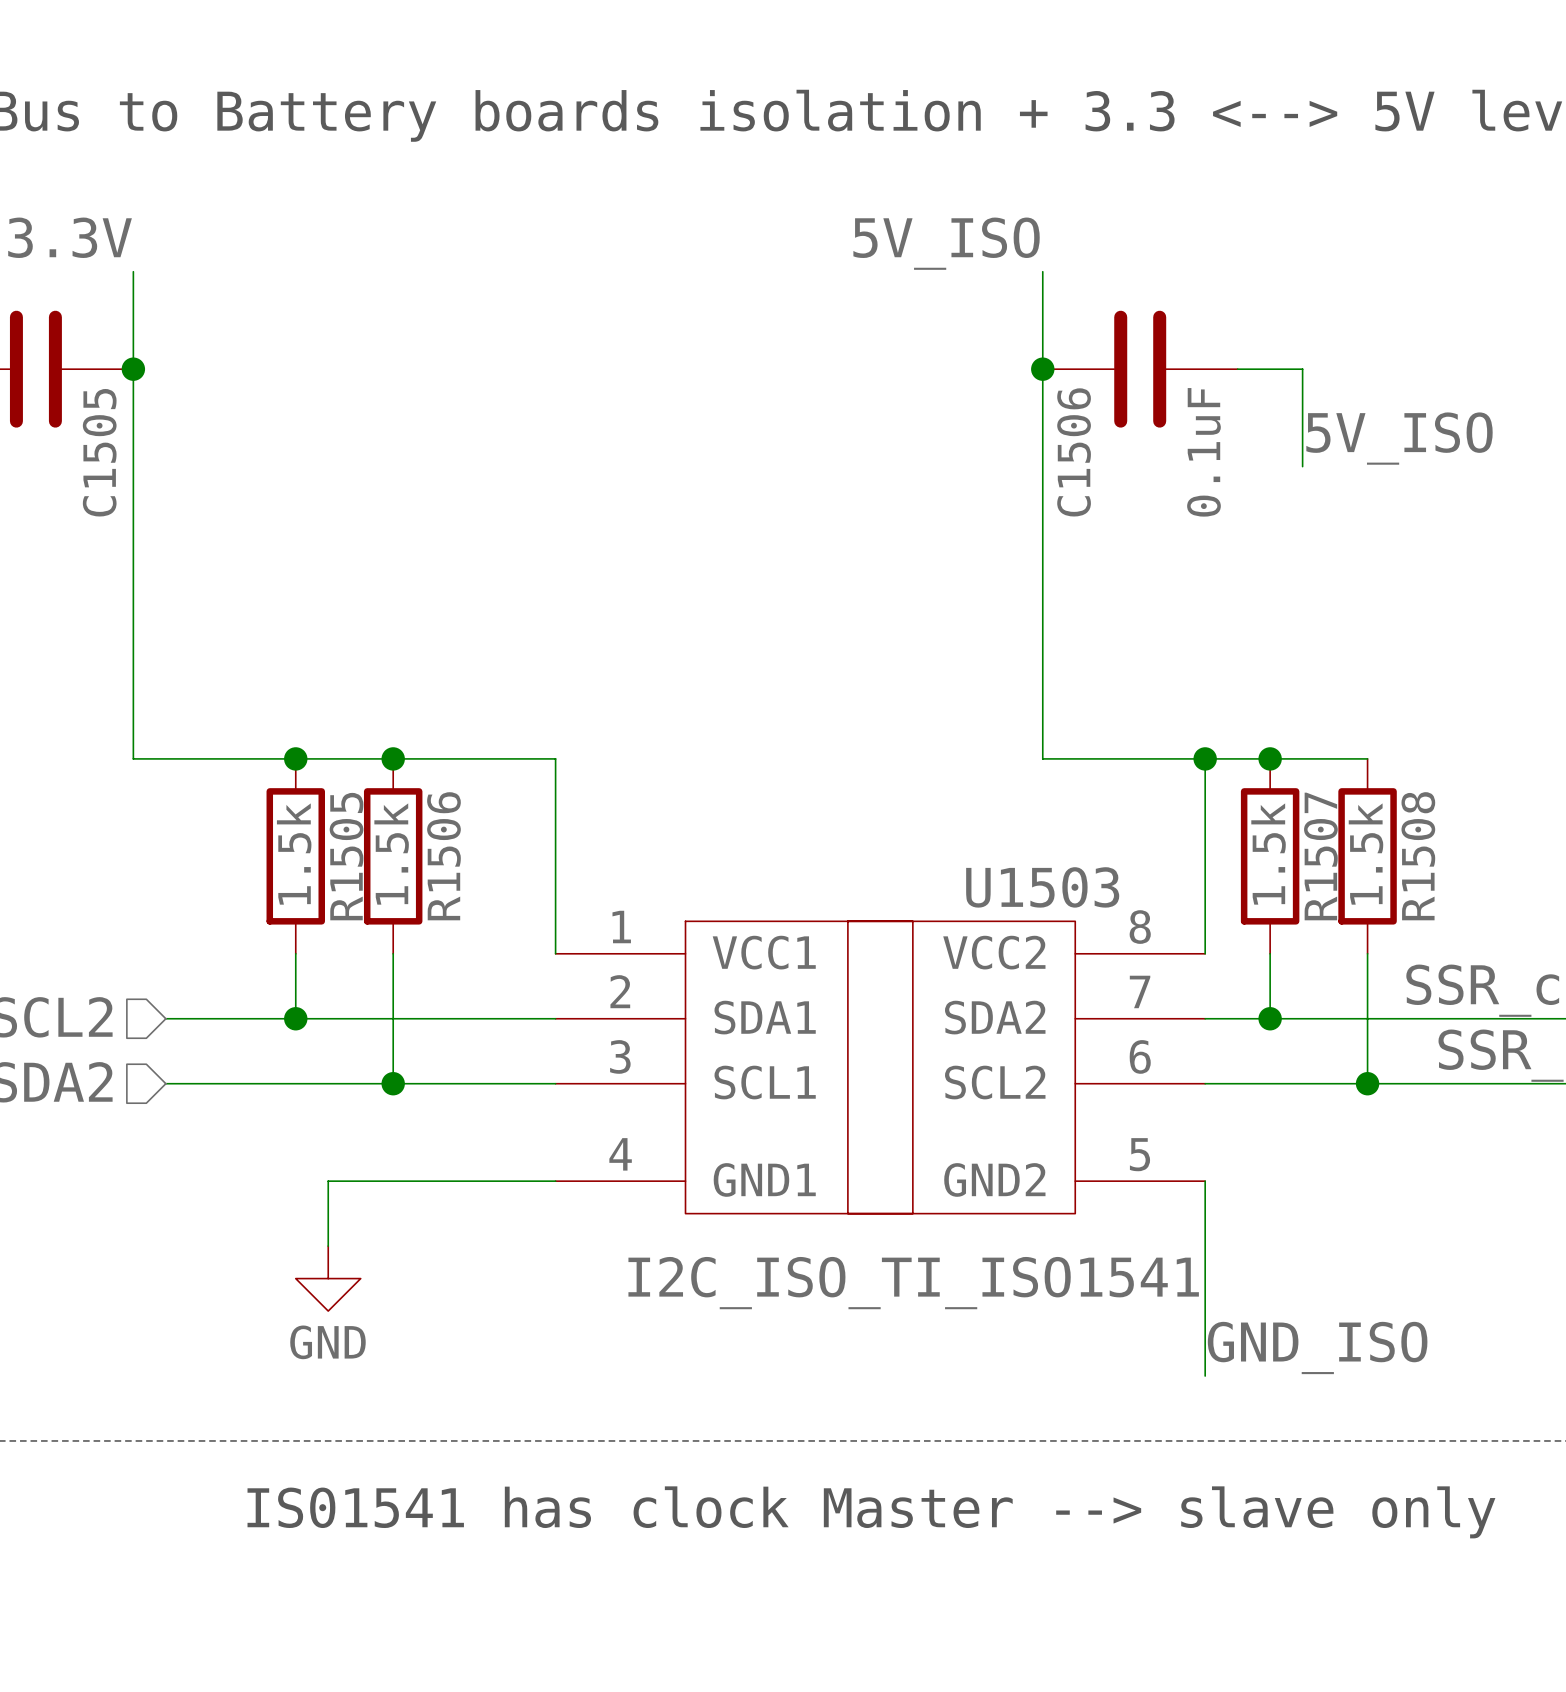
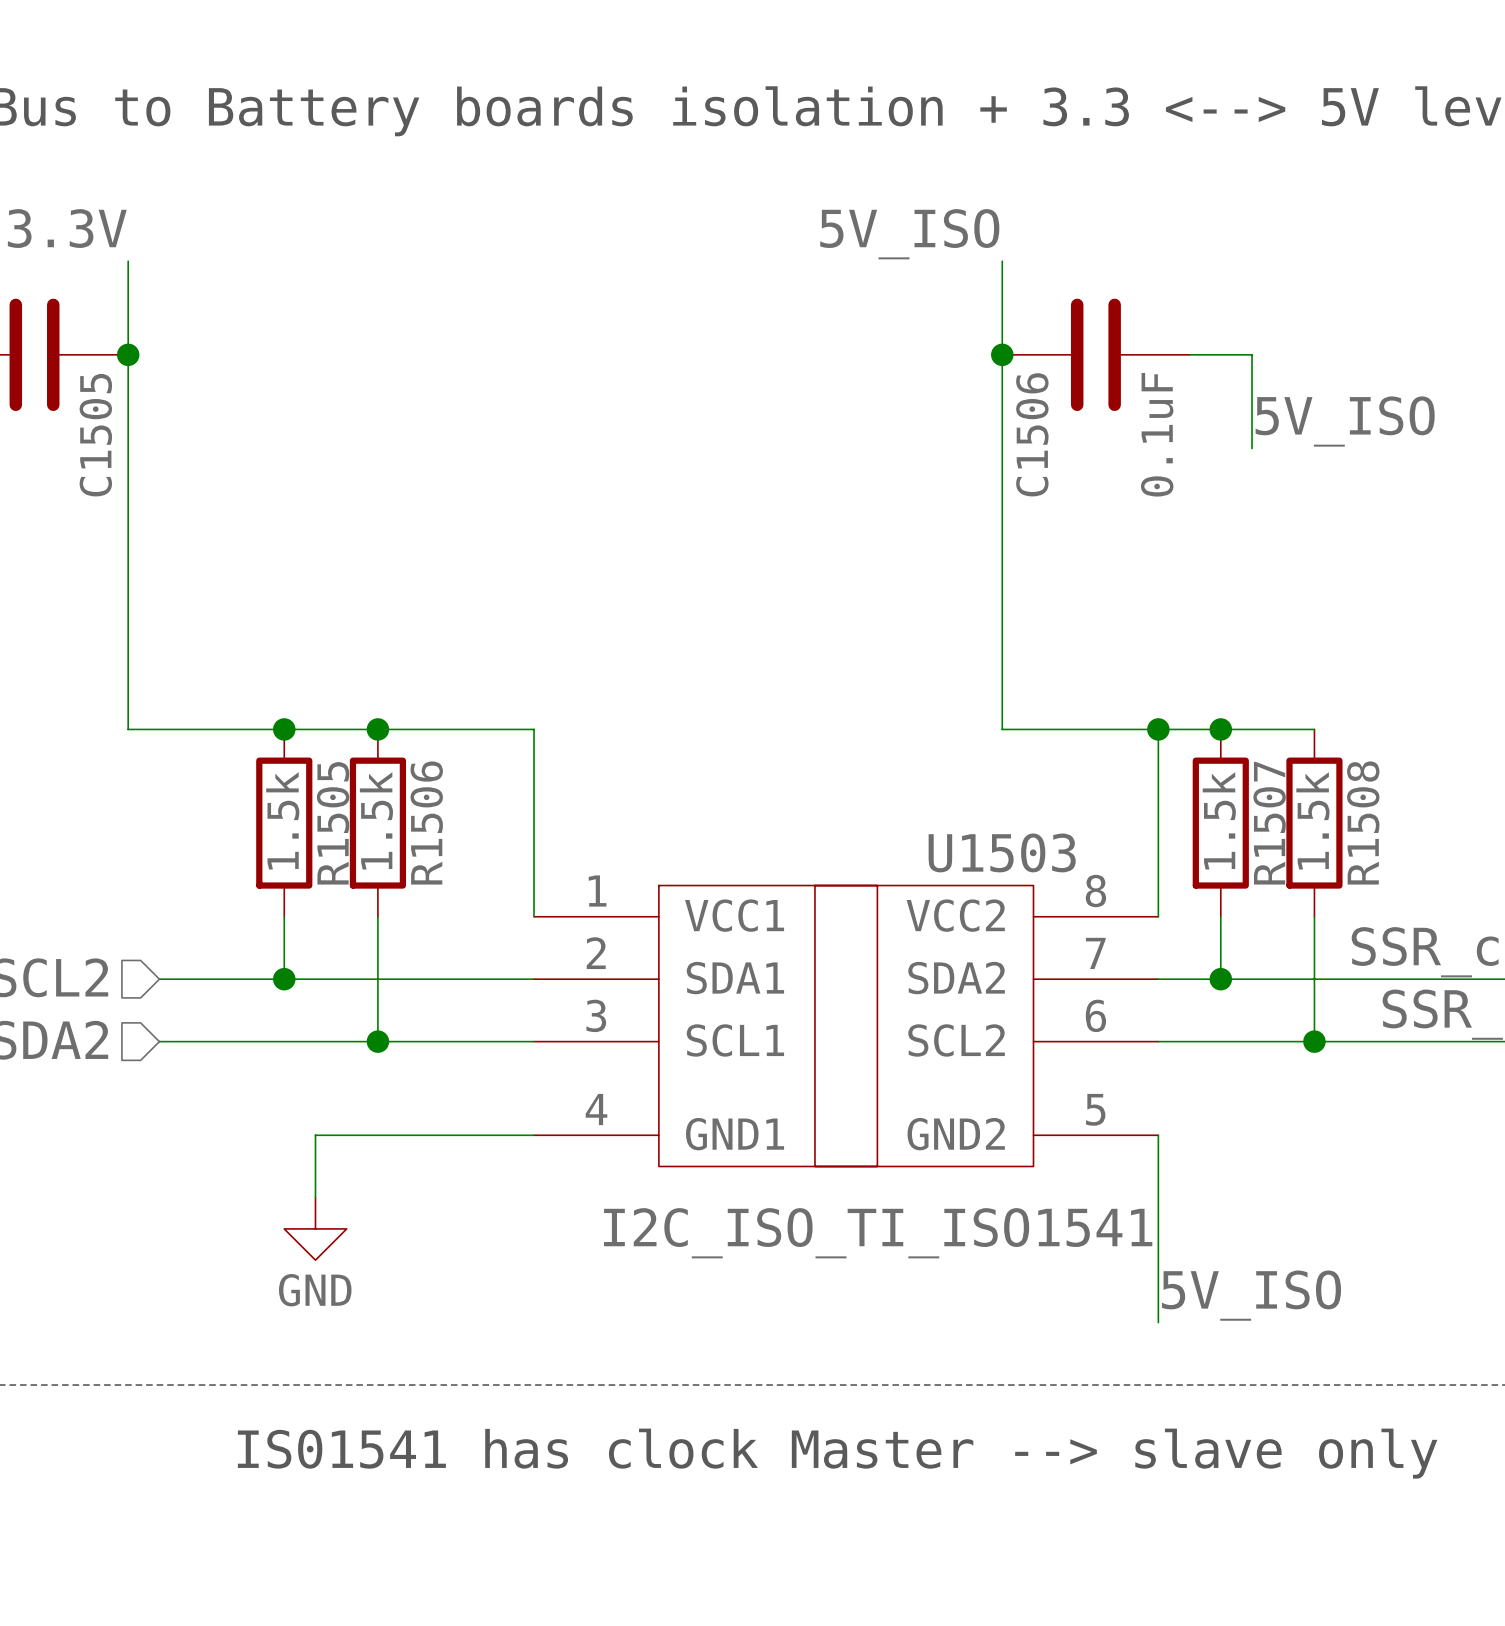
label: GND_ISO (1317, 1347) -> 5V_ISO (1251, 1295)

